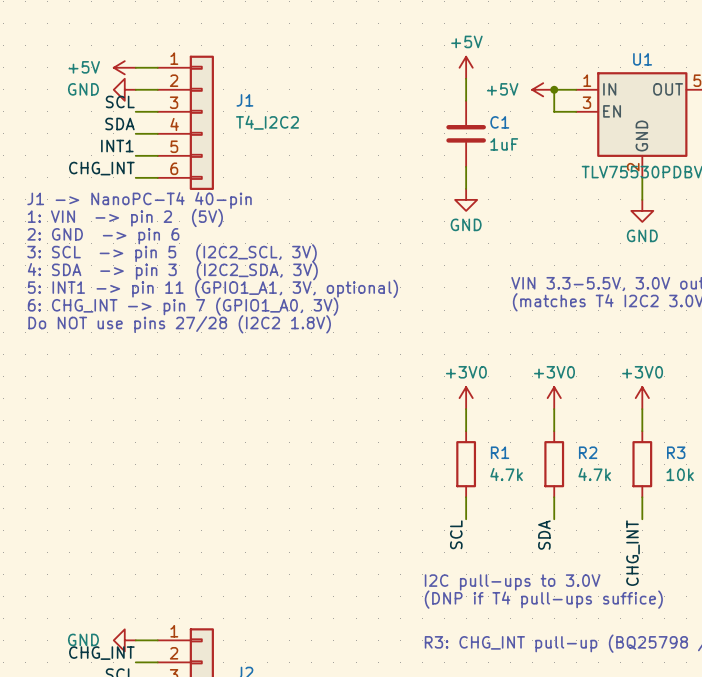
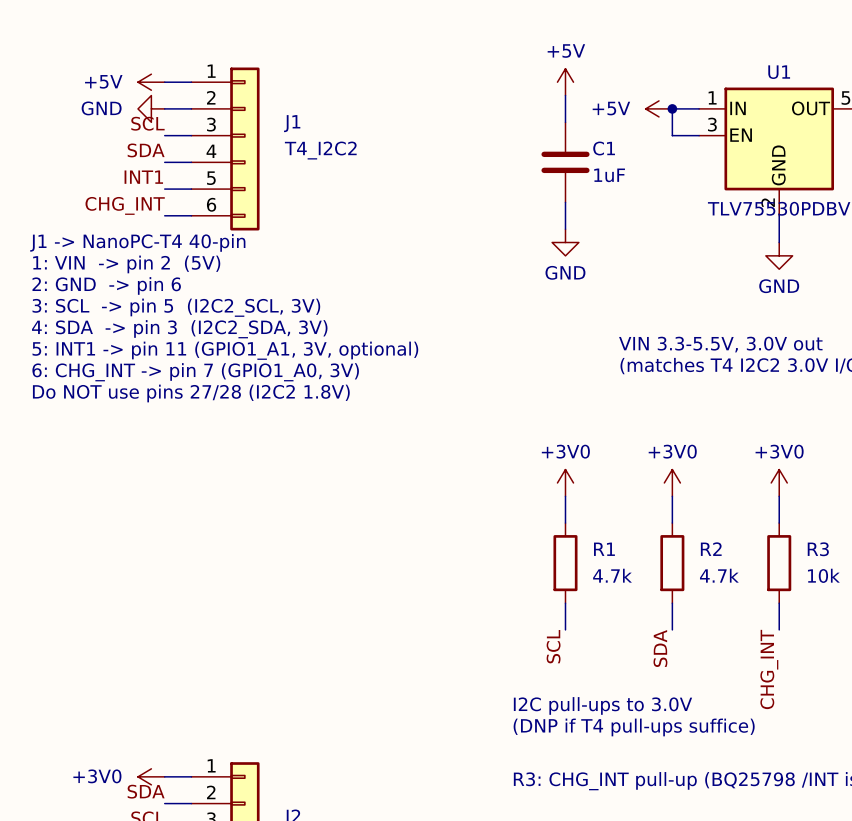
power symbol: GND (124, 640) -> +3V0 (151, 776)
label: CHG_INT (101, 653) -> SDA (146, 791)

